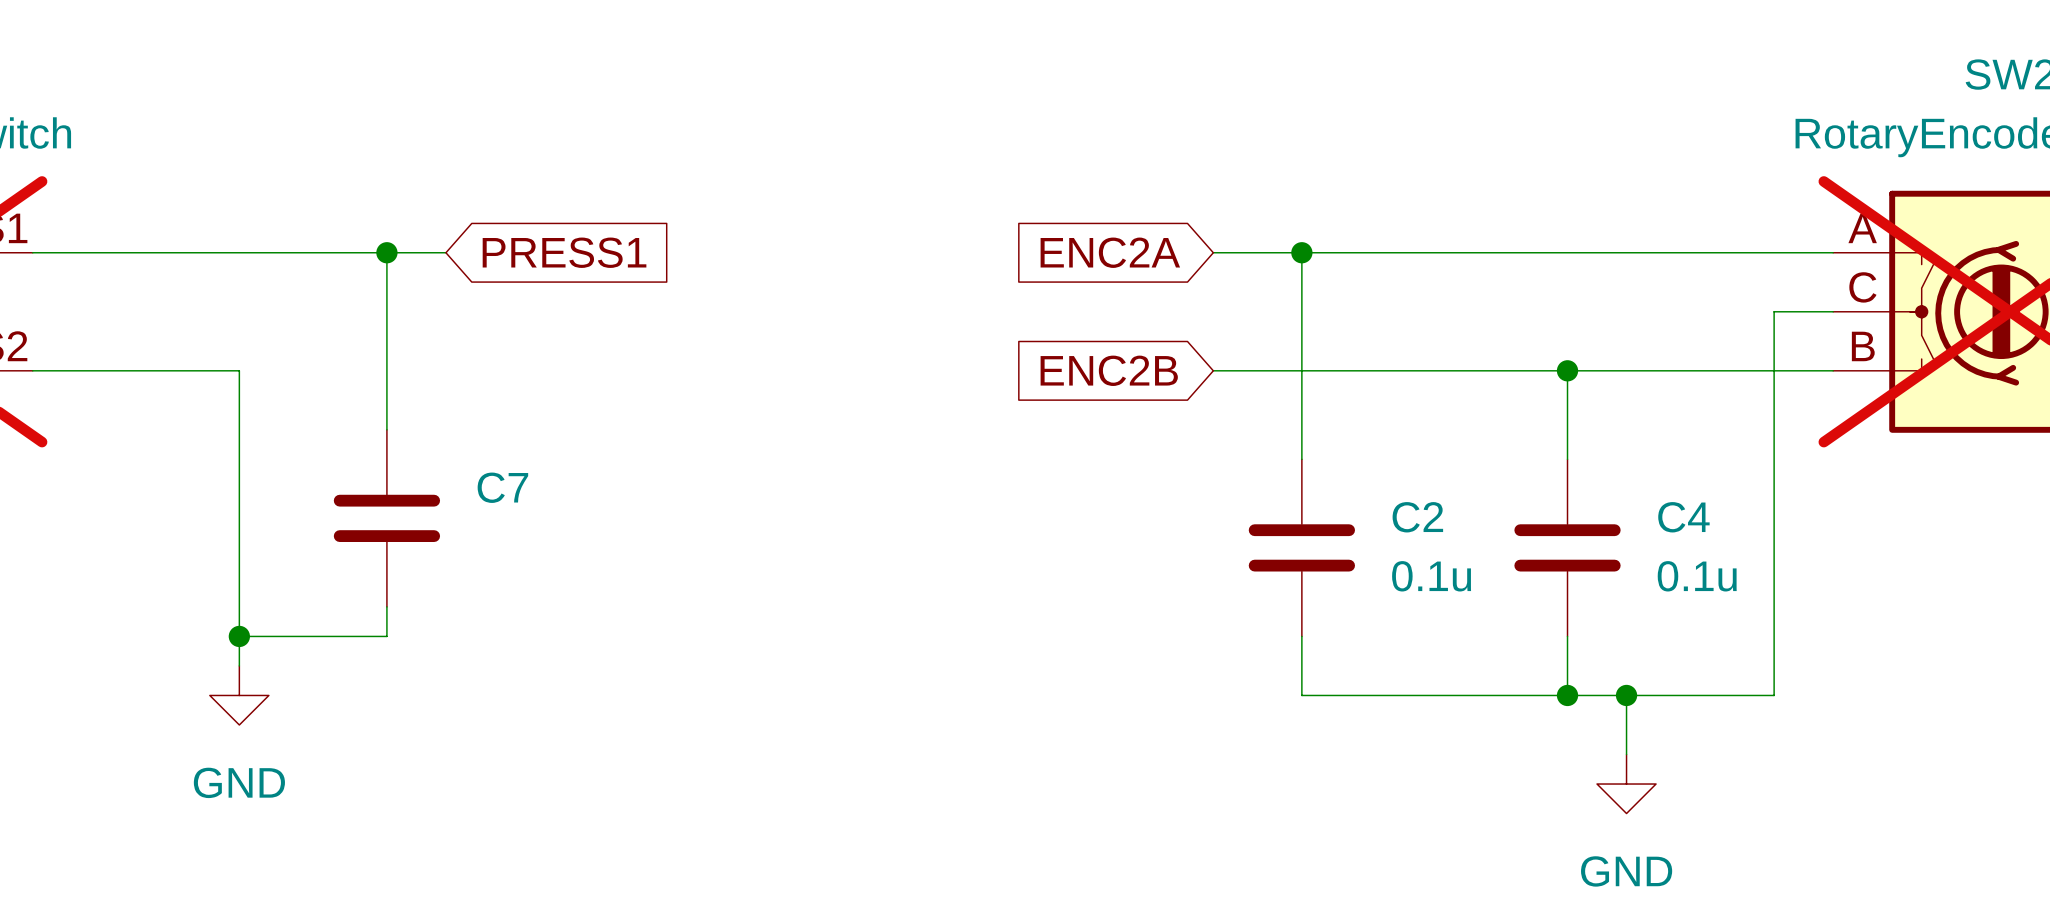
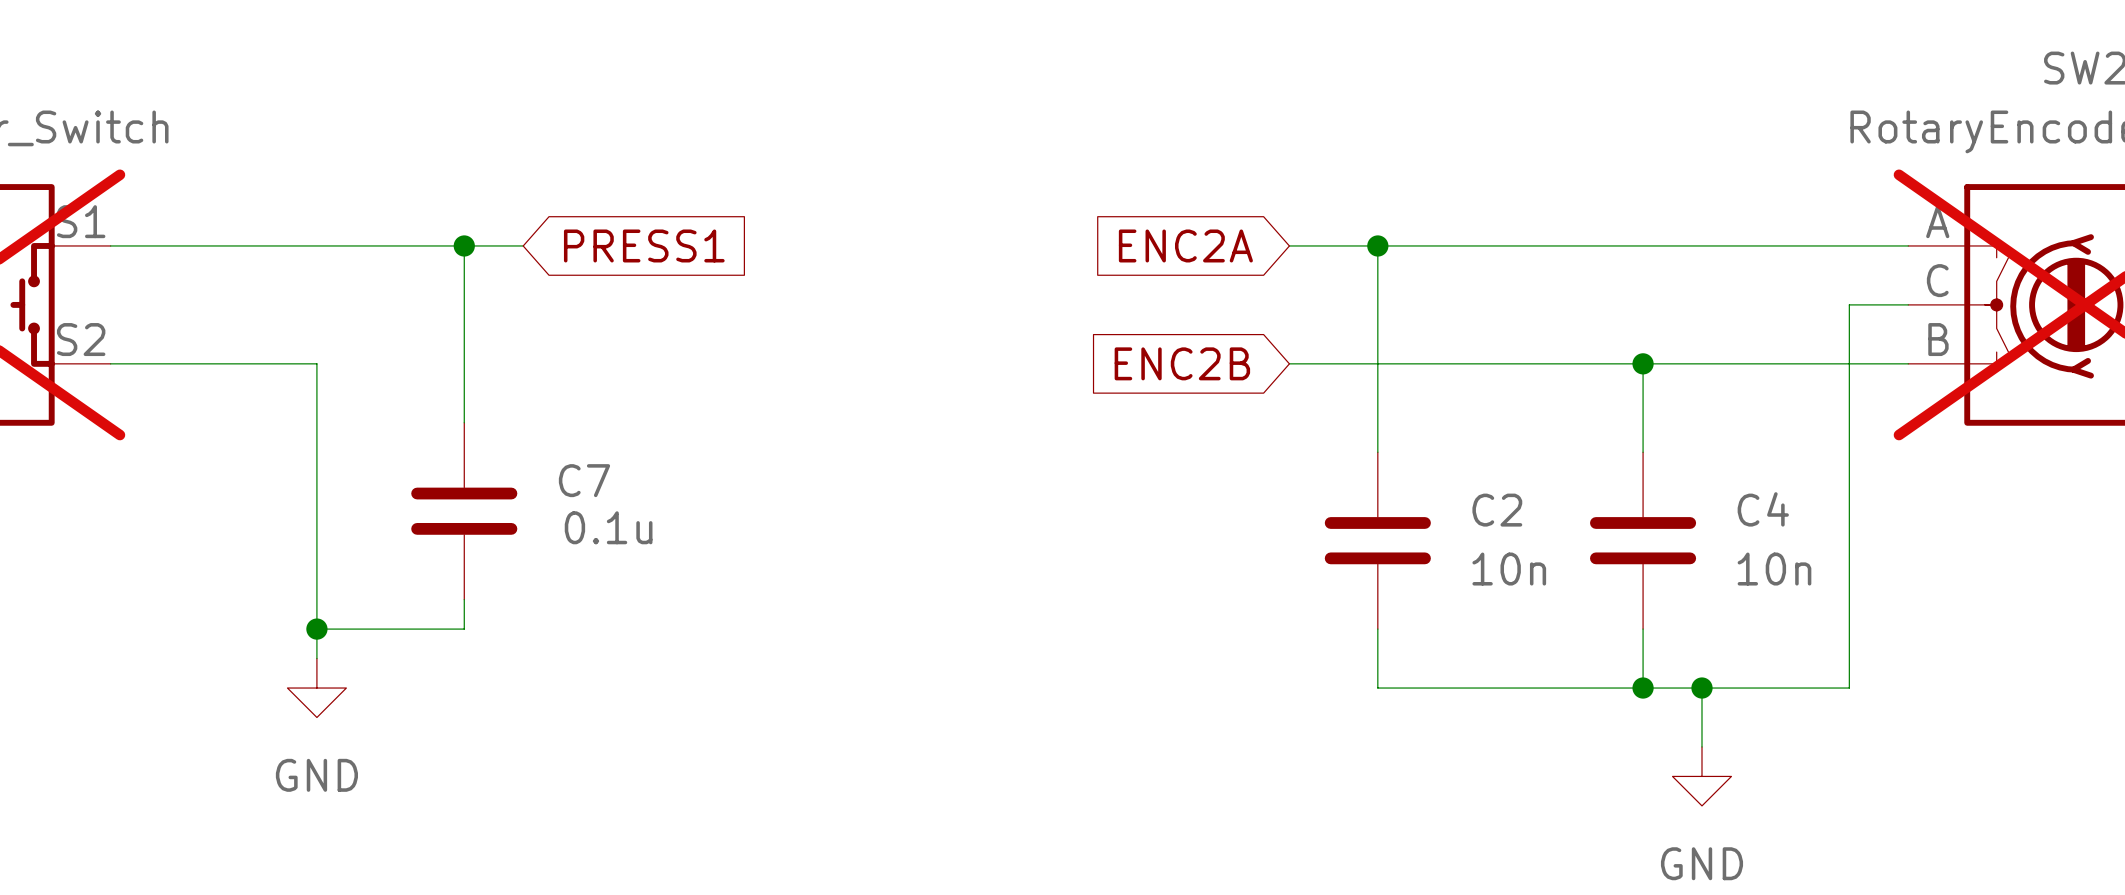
C7 value: none -> 0.1u (608, 527)
C2 value: 0.1u (1431, 576) -> 10n (1509, 569)
C4 value: 0.1u (1697, 576) -> 10n (1774, 569)

